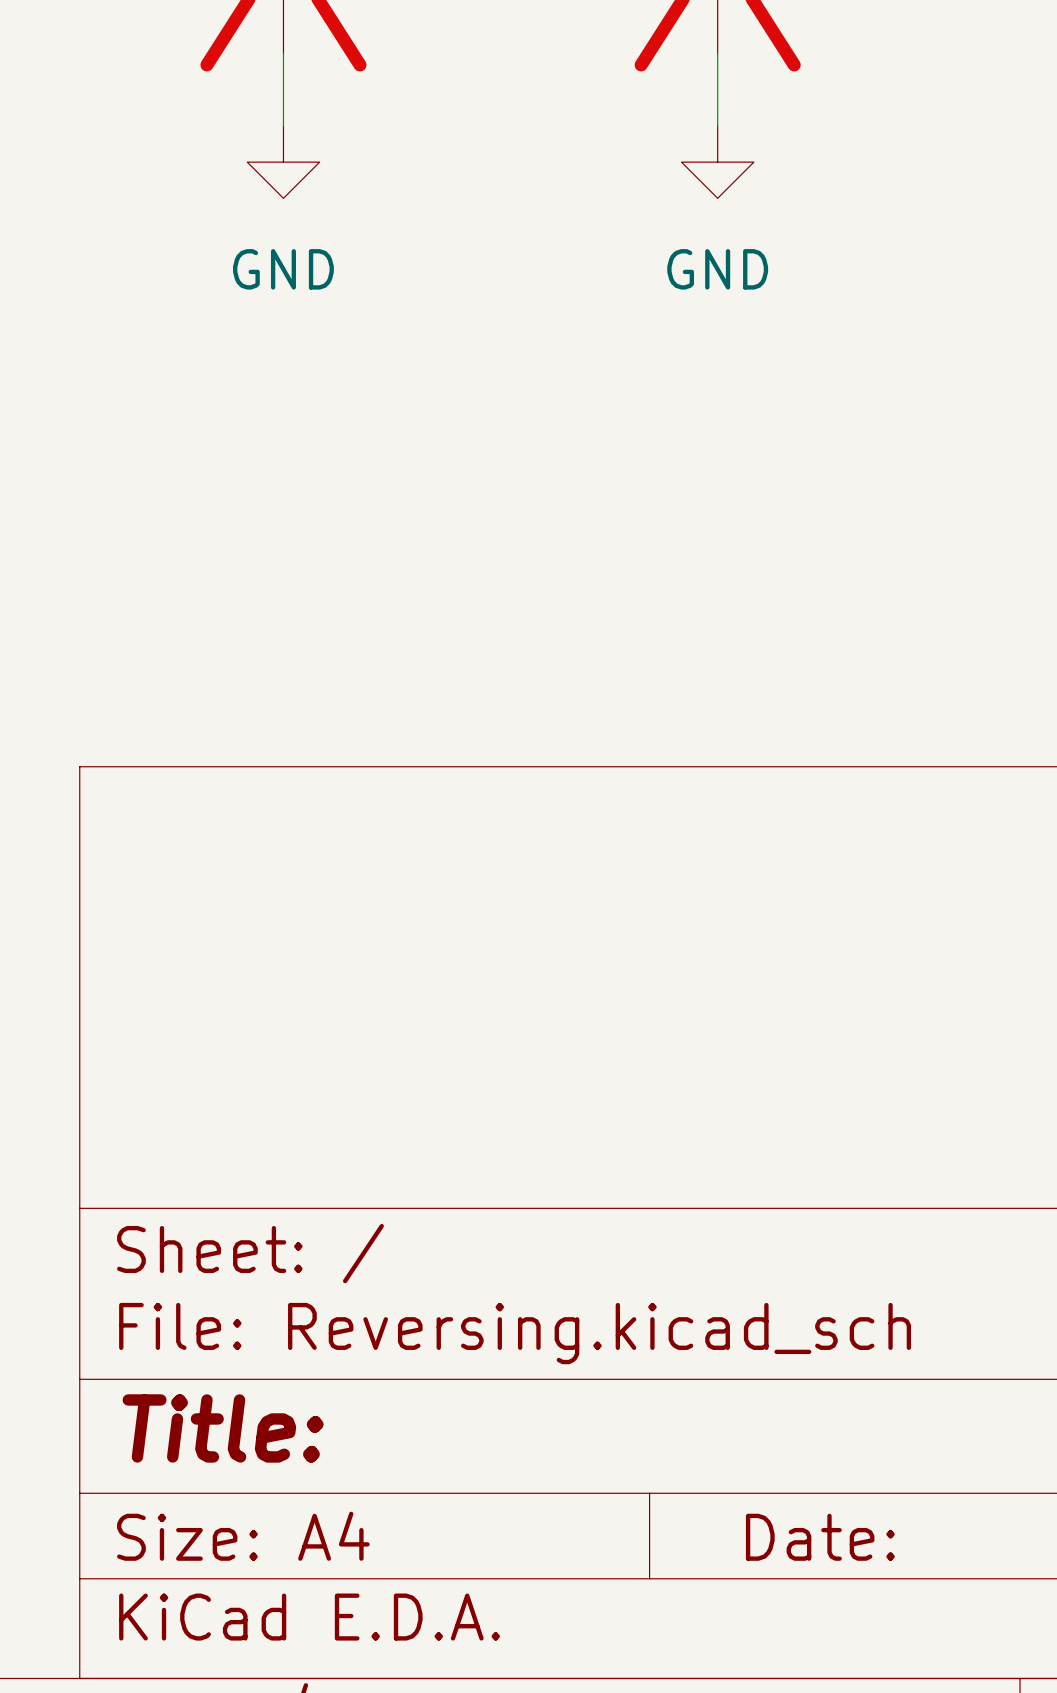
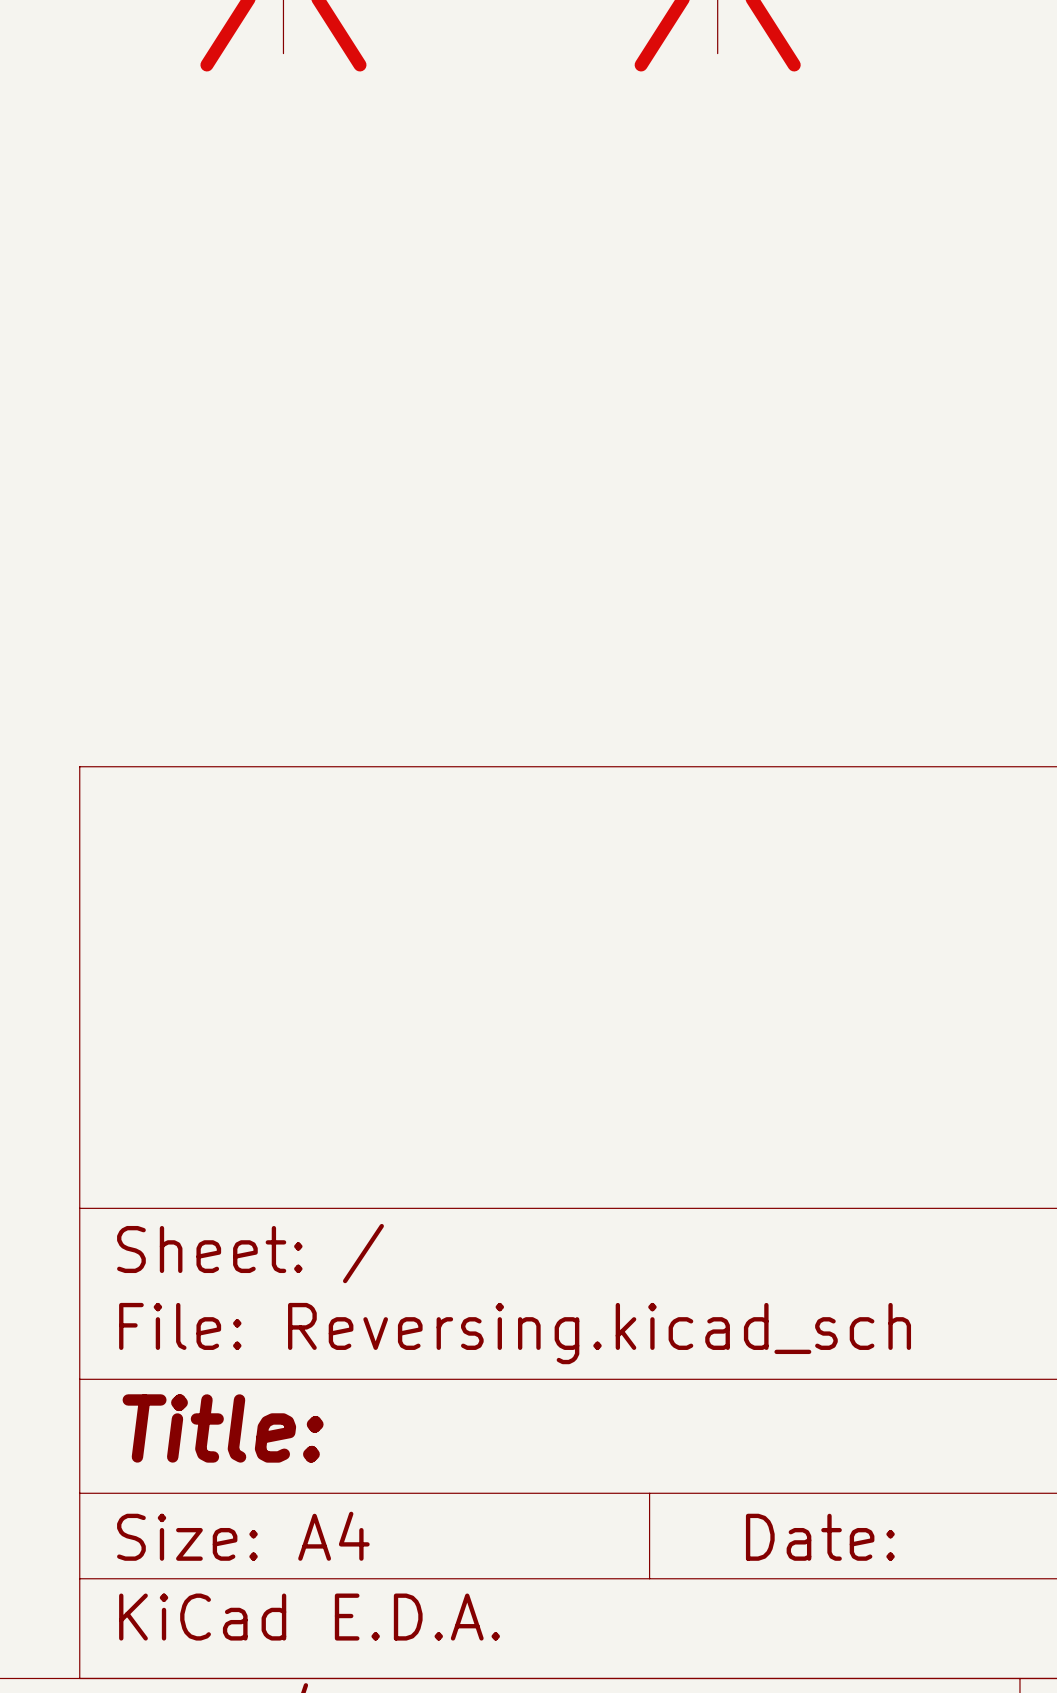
wire: (283, 53) (283, 125) -> none
wire: (717, 53) (717, 125) -> none
power symbol: GND (283, 162) -> none
power symbol: GND (717, 162) -> none

